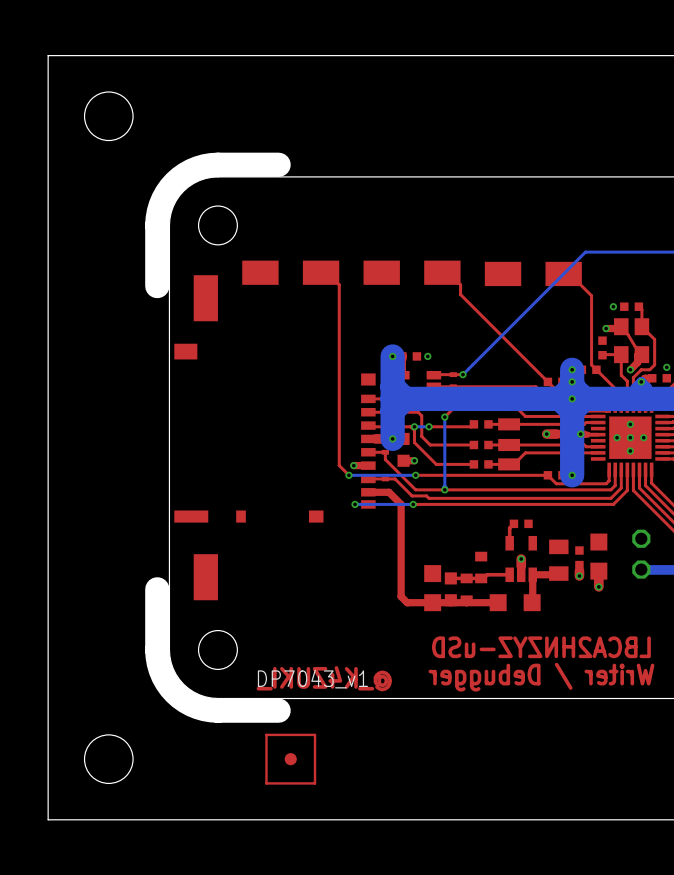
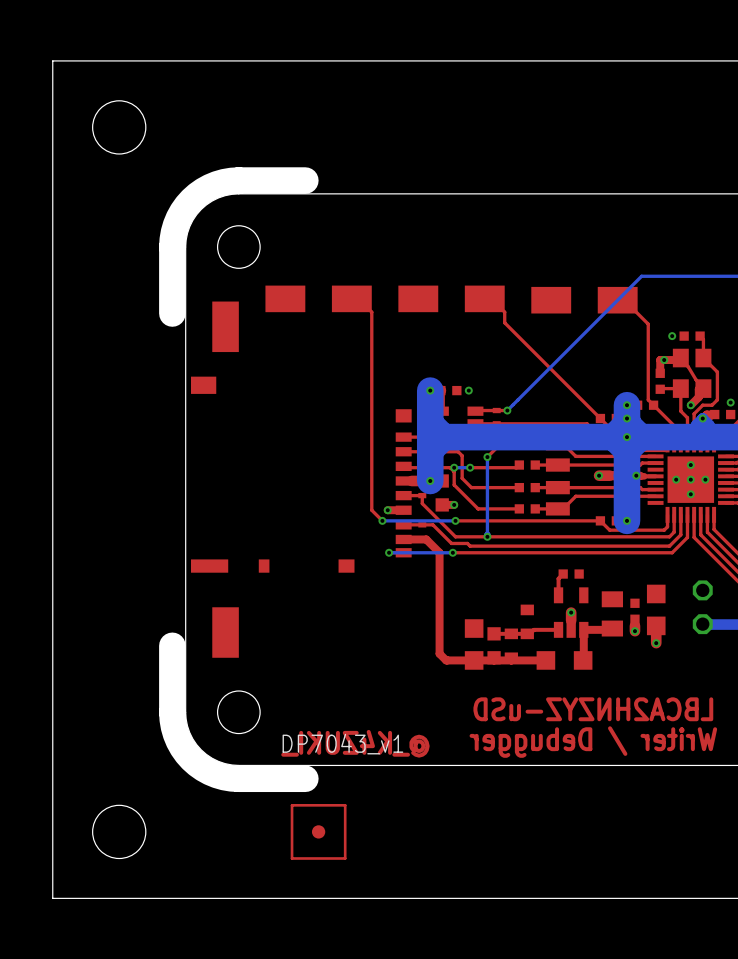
top track: none -> (664, 360) (660, 360) (660, 373)

